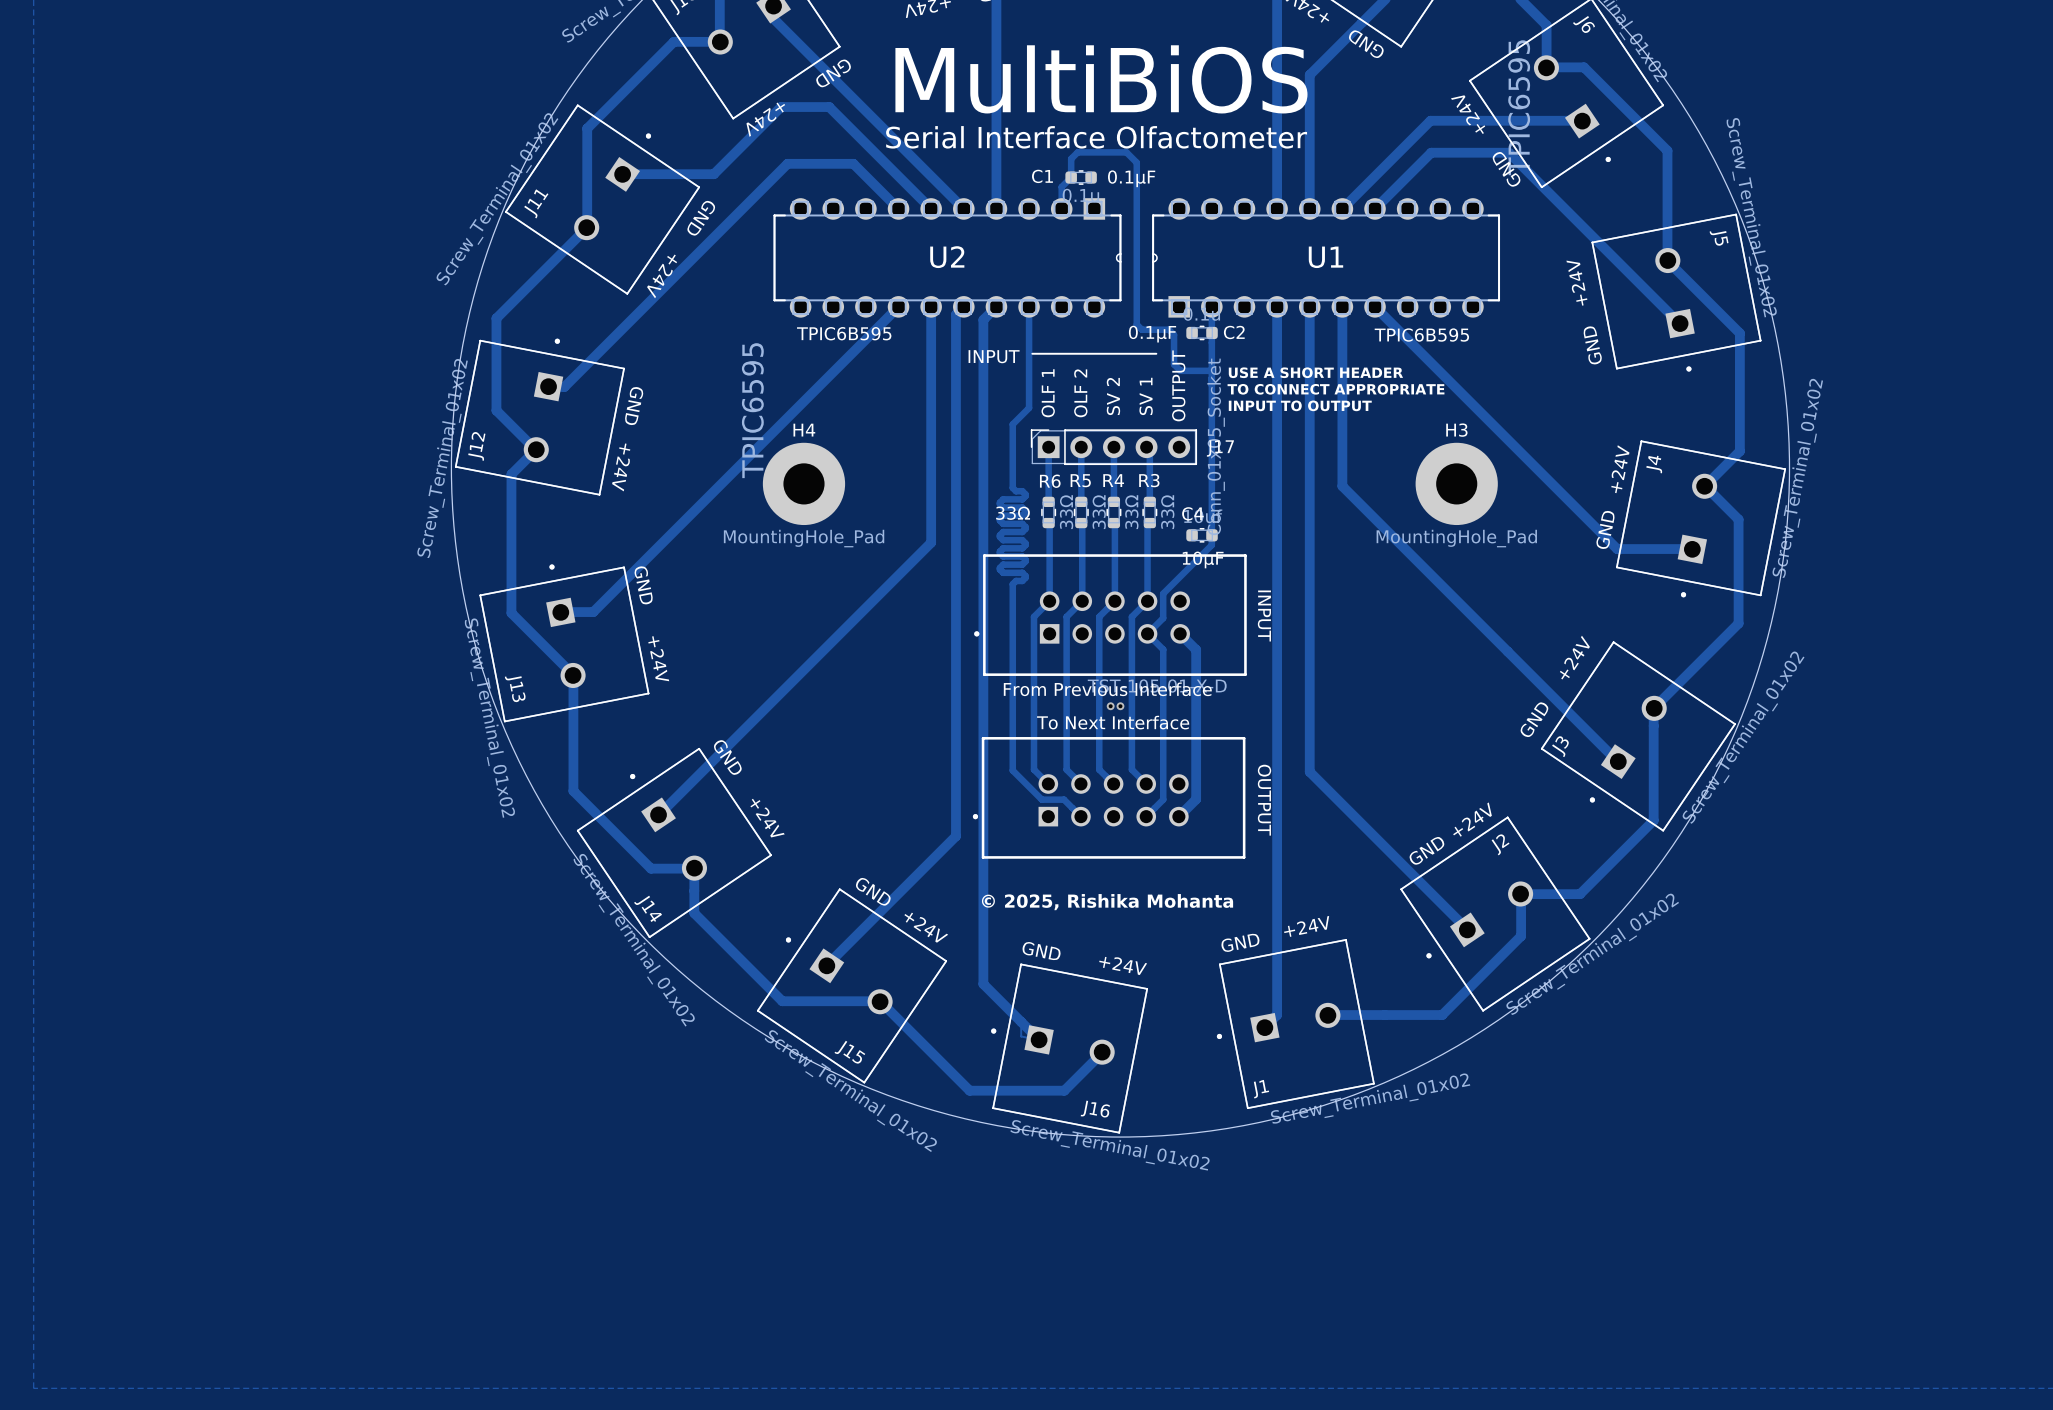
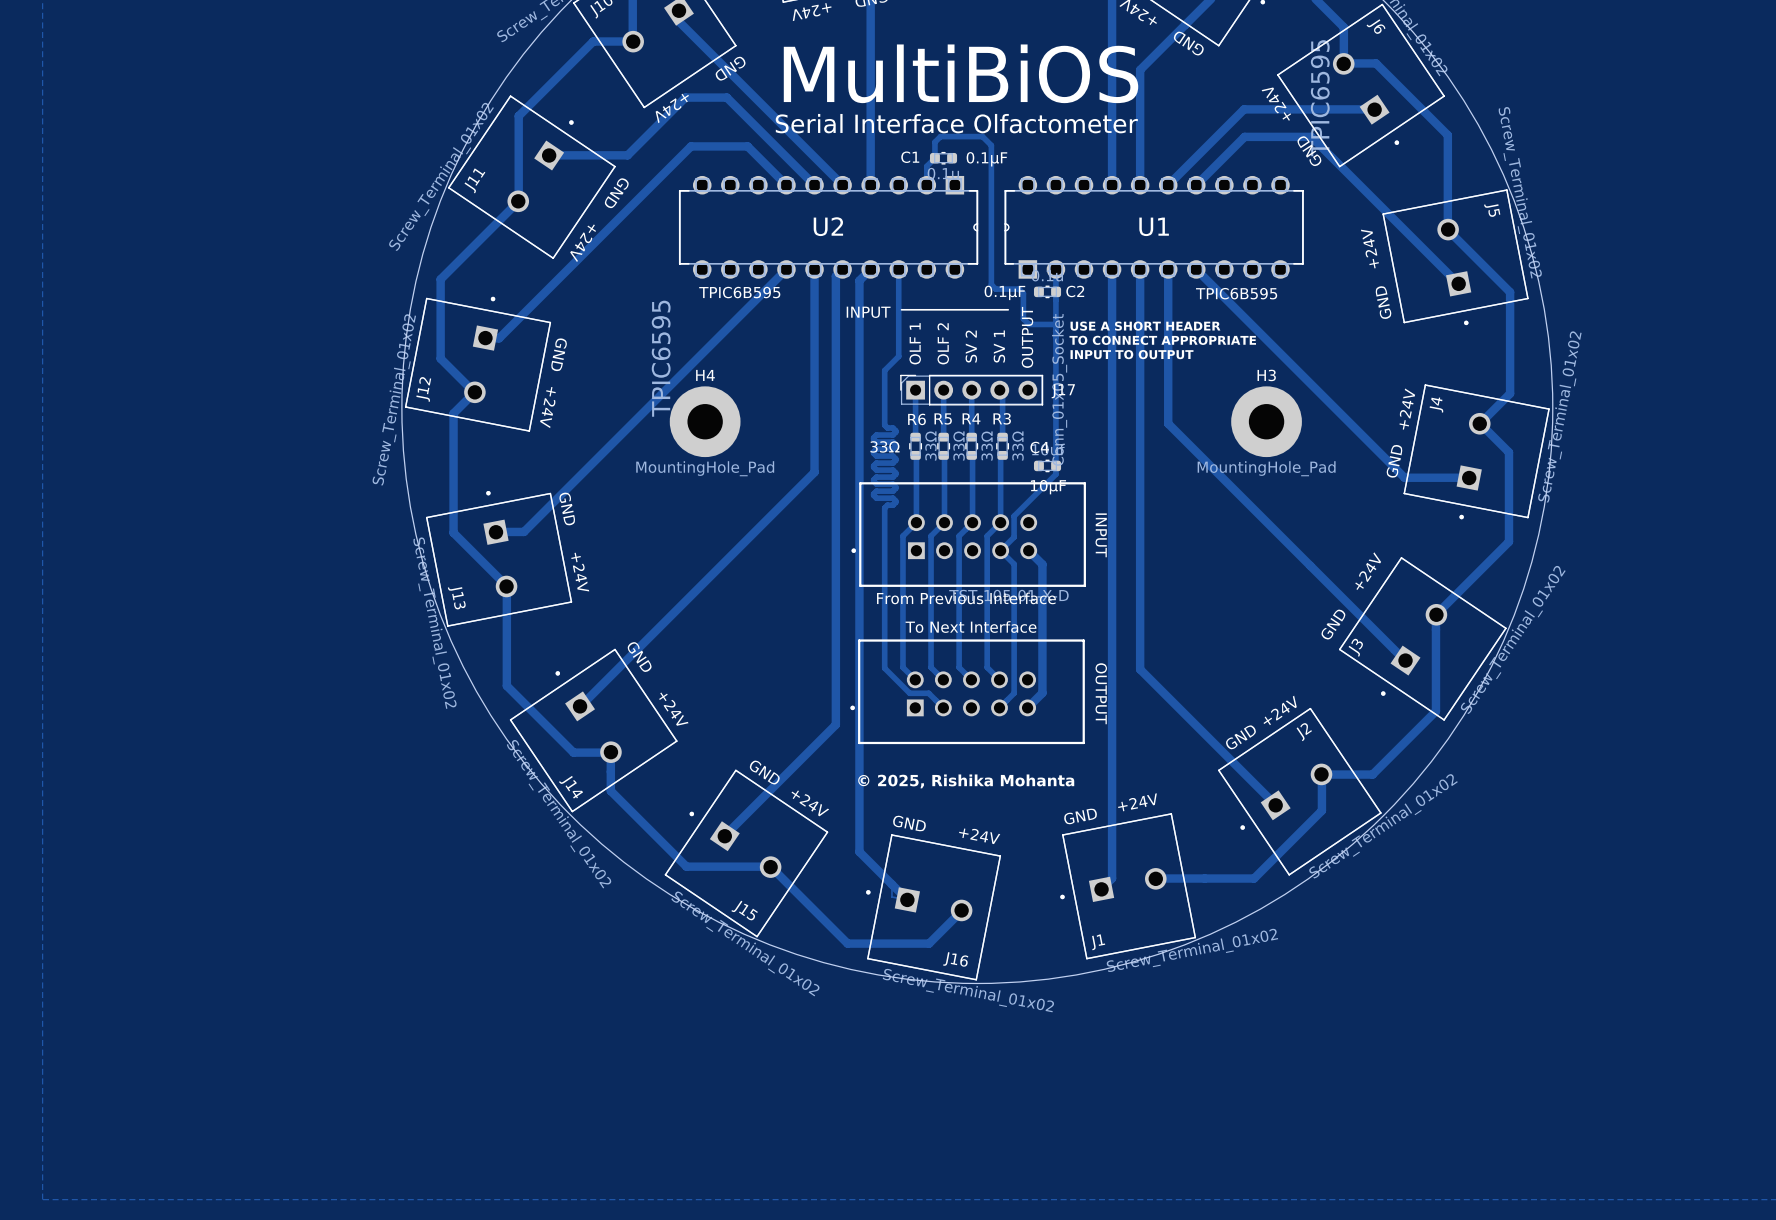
via: (1110, 706) -> none
via: (1120, 706) -> none

